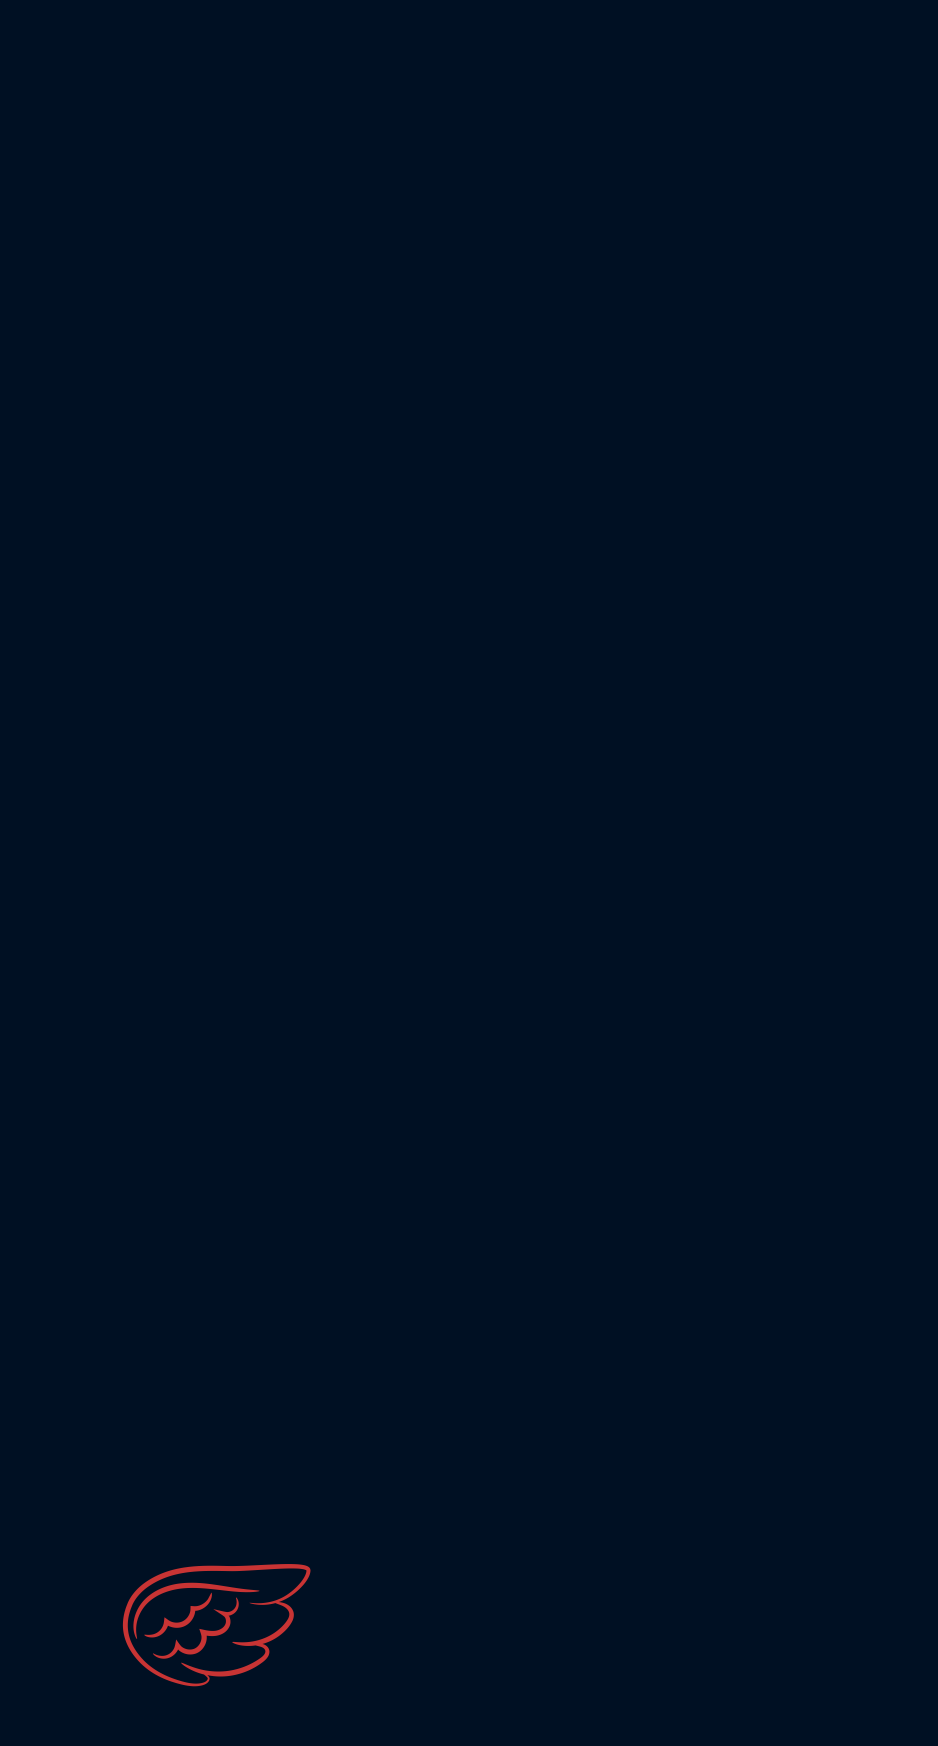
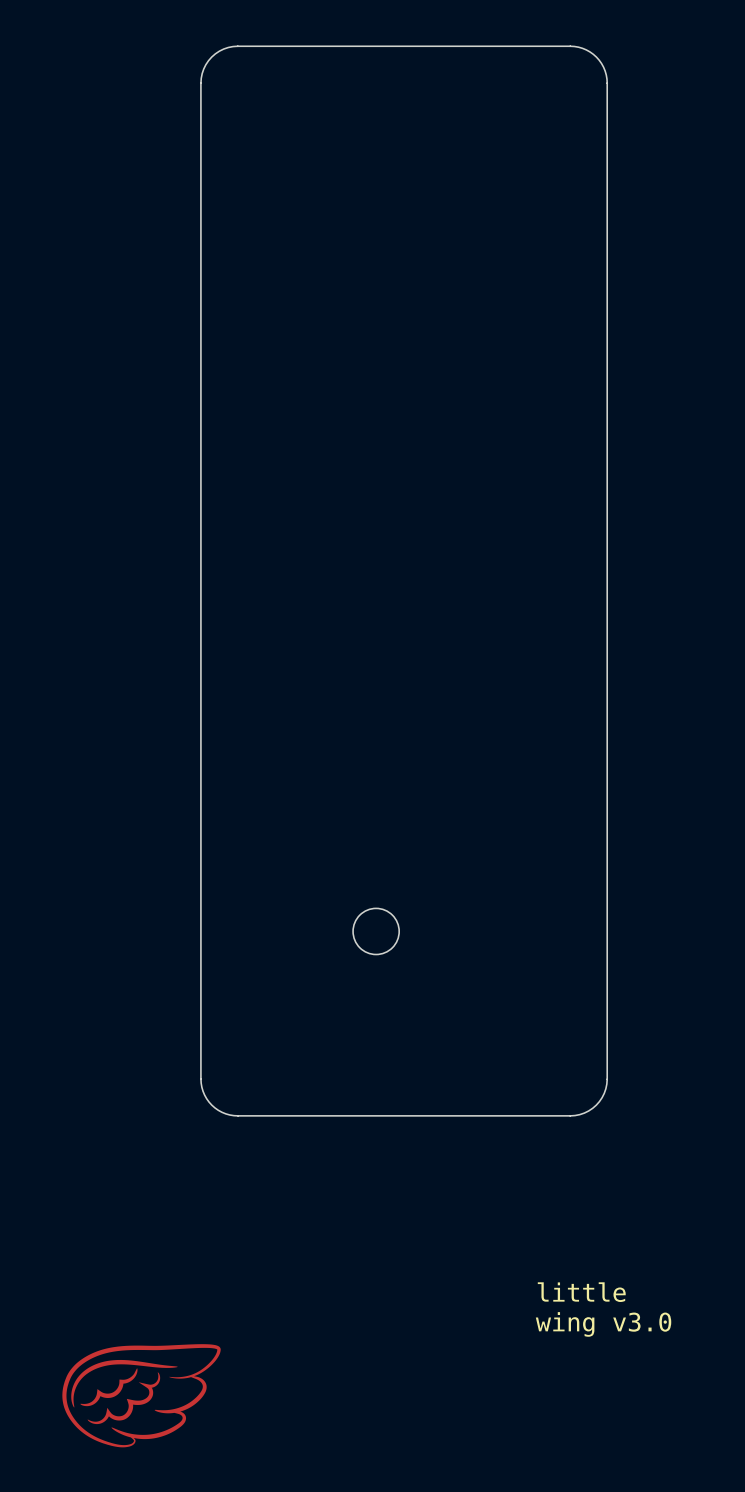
board edge: none -> (237, 46) (574, 46) (593, 54) (605, 70) (607, 83) (607, 1079) (604, 1093) (599, 1101) (592, 1108) (579, 1114) (233, 1115) (214, 1107) (203, 1091) (200, 1078) (200, 83) (203, 69) (211, 57) (223, 49) (237, 46)
round board edge: none -> [352, 908, 400, 955]
text: none -> little (581, 1292)
text: none -> wing v3.0 (603, 1324)

